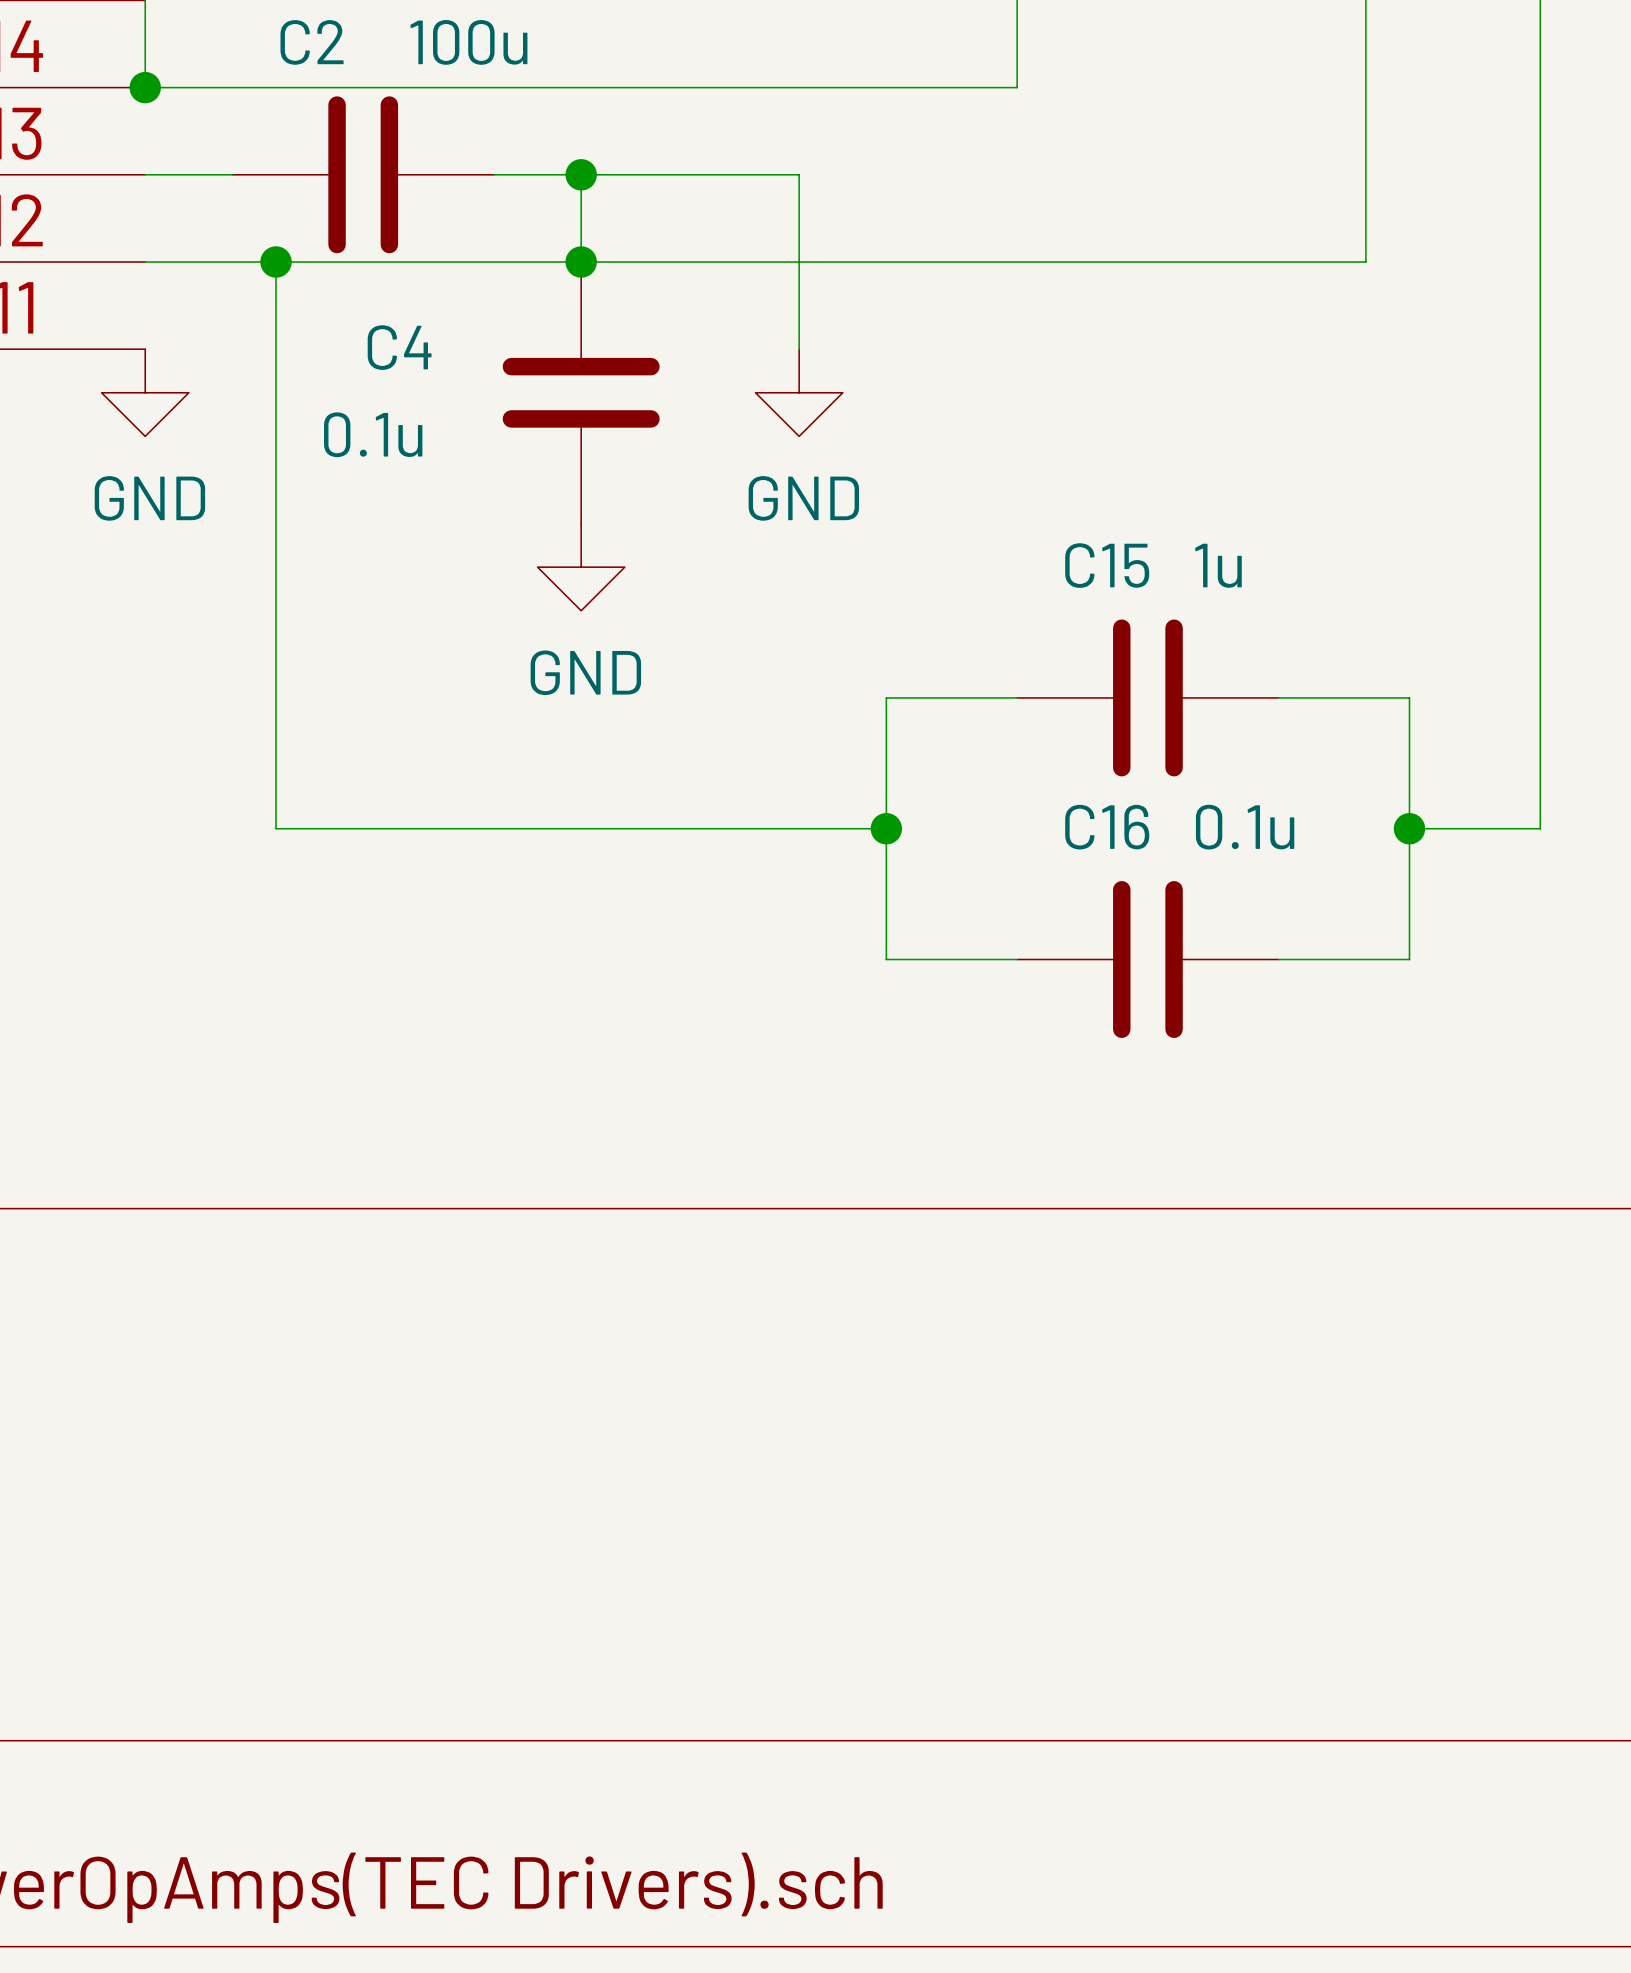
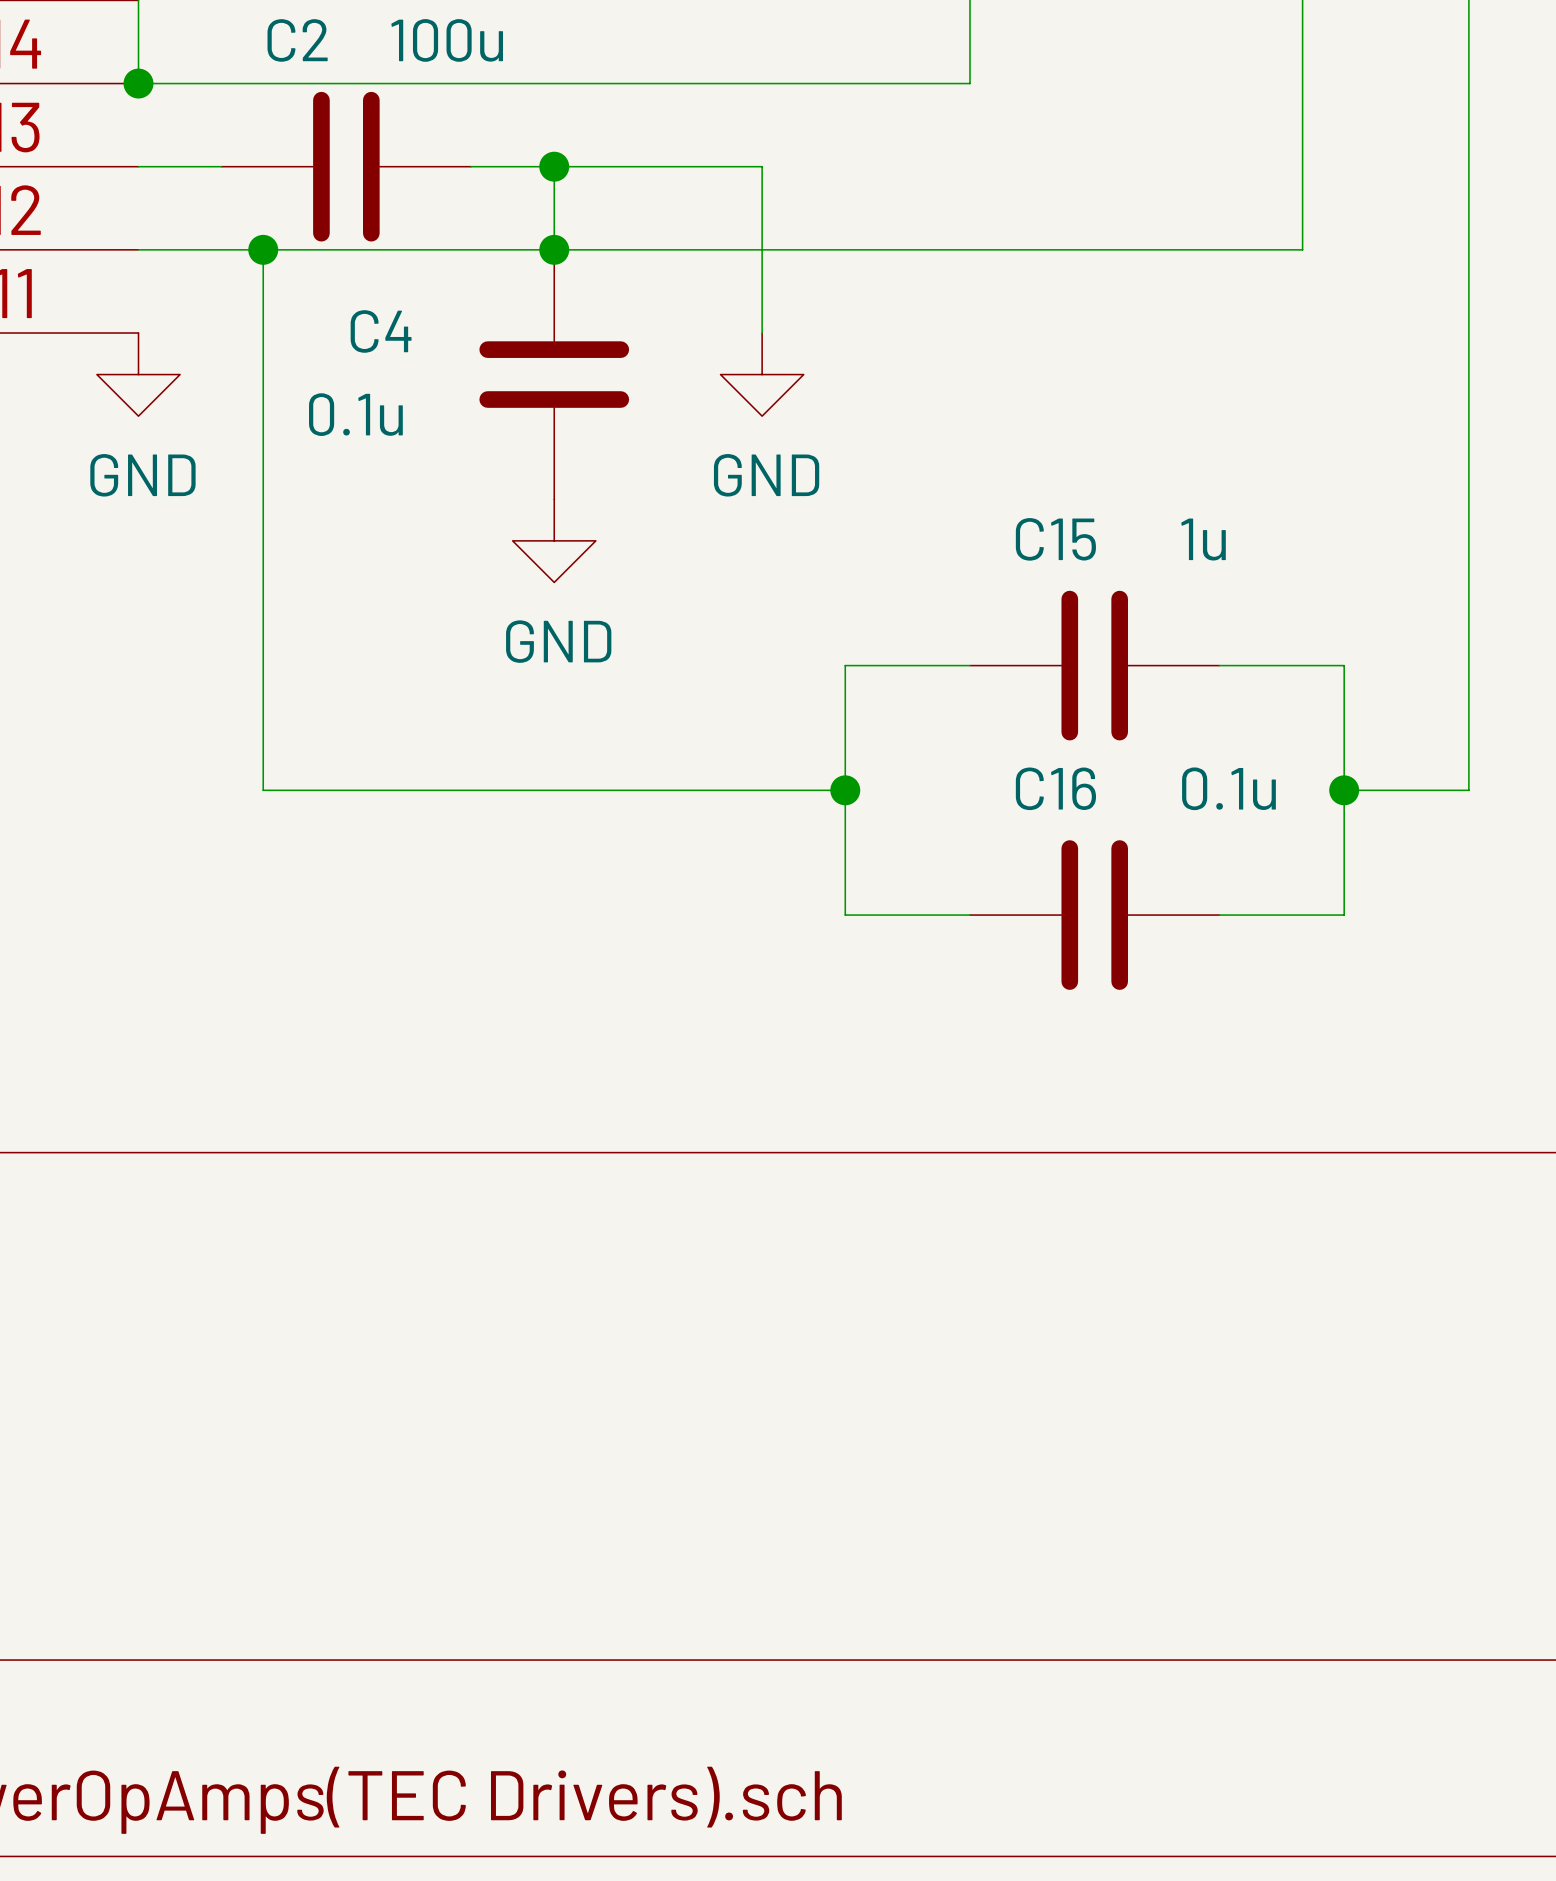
C15 value position: 1u (1218, 565) -> 1u (1203, 539)
C16 value position: 0.1u (1245, 827) -> 0.1u (1228, 788)

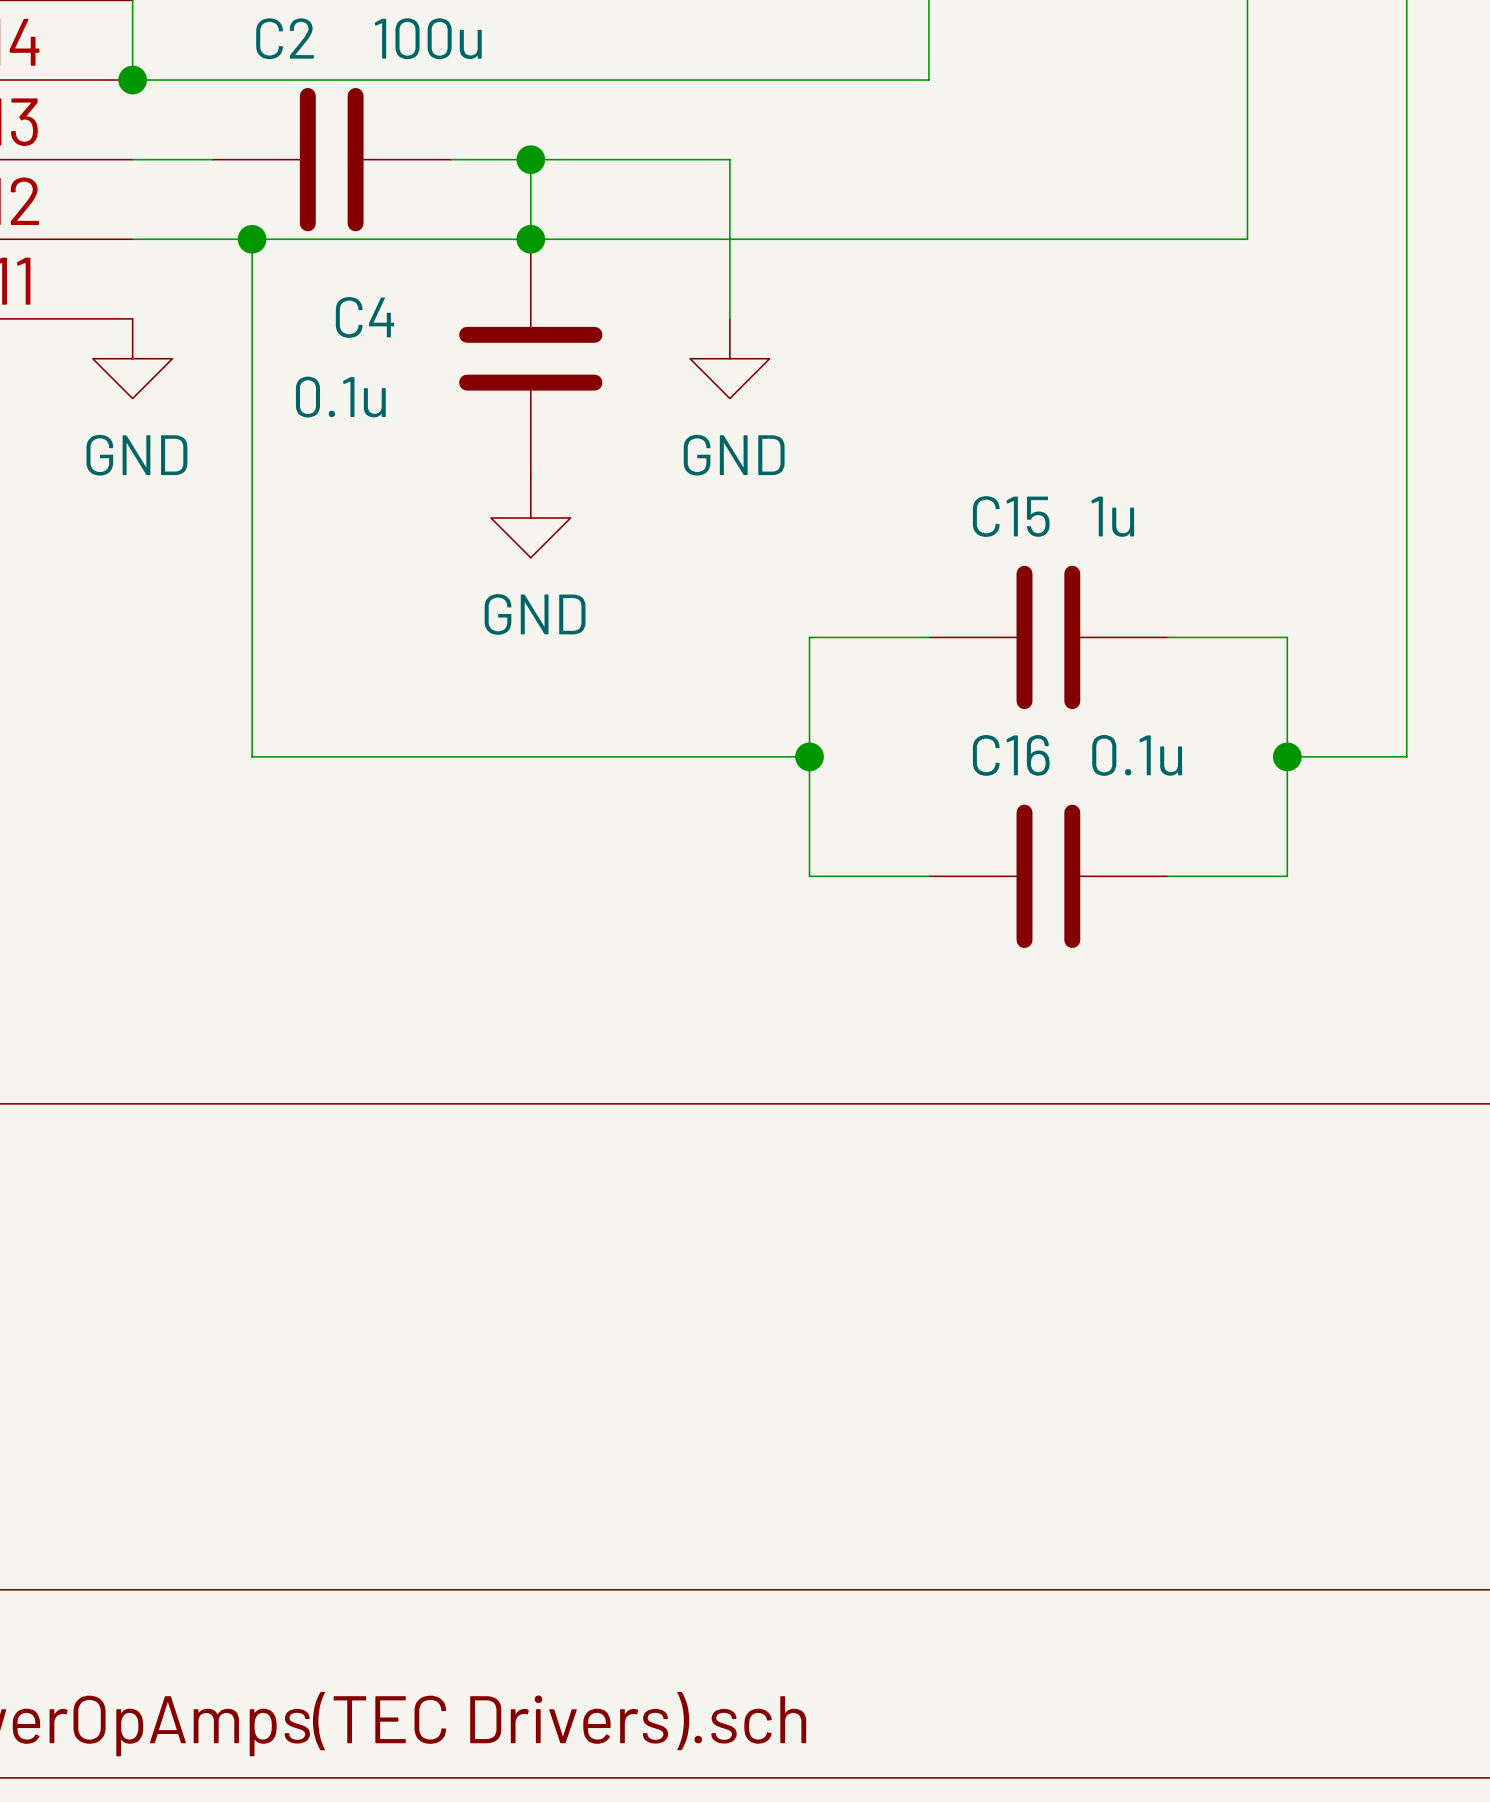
C15 value position: 1u (1203, 539) -> 1u (1112, 516)
C16 value position: 0.1u (1228, 788) -> 0.1u (1137, 755)

